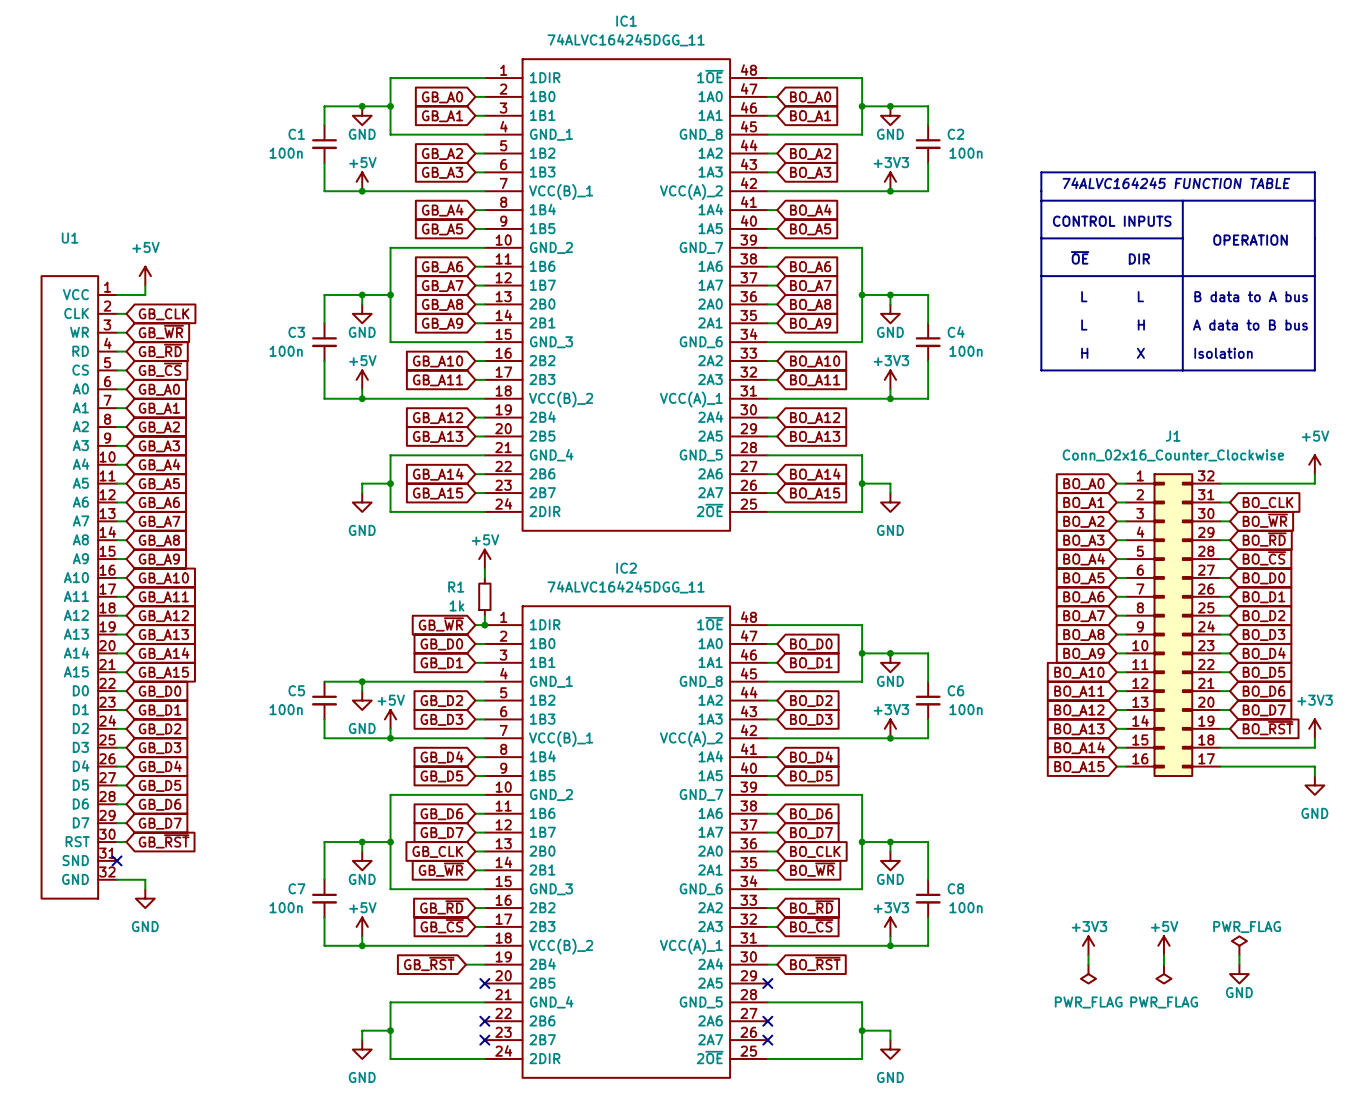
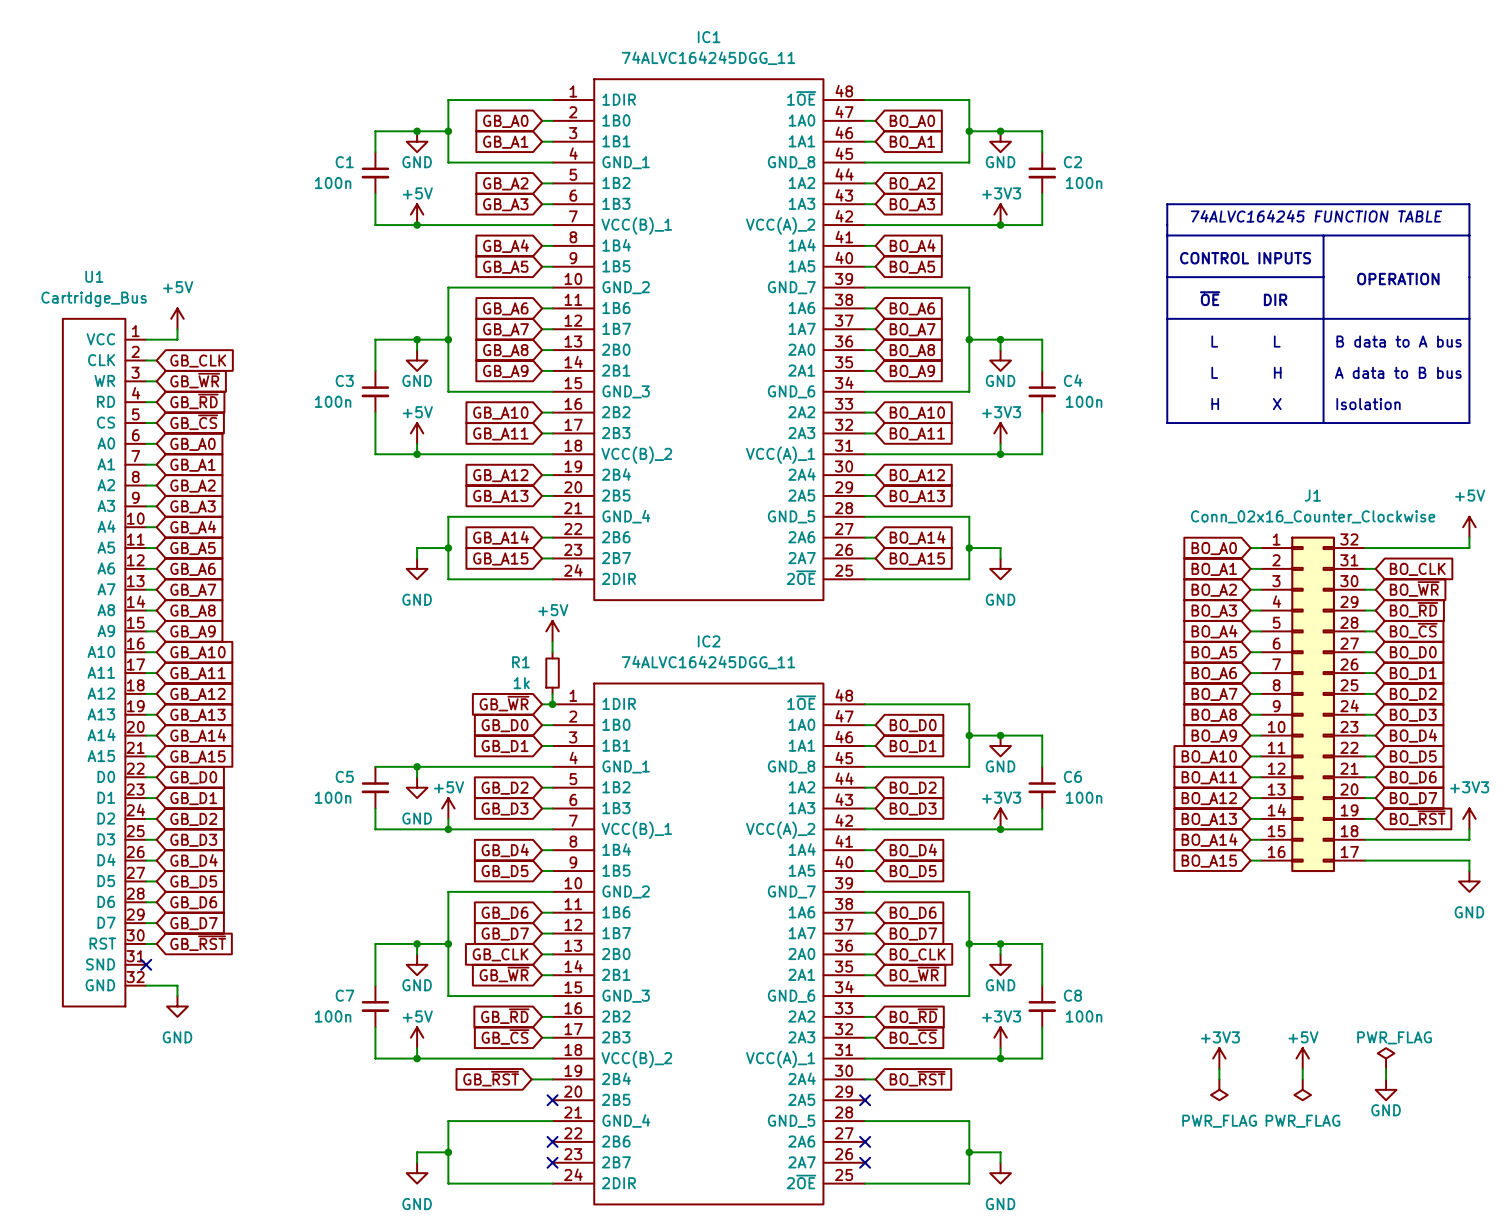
U1 value: none -> Cartridge_Bus (94, 299)

